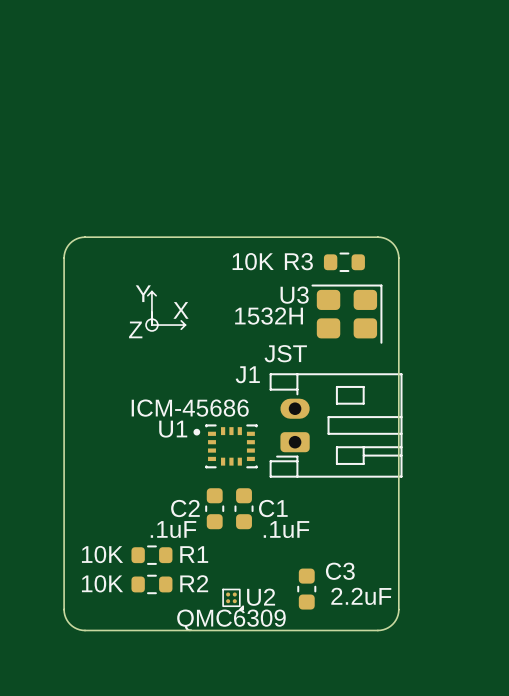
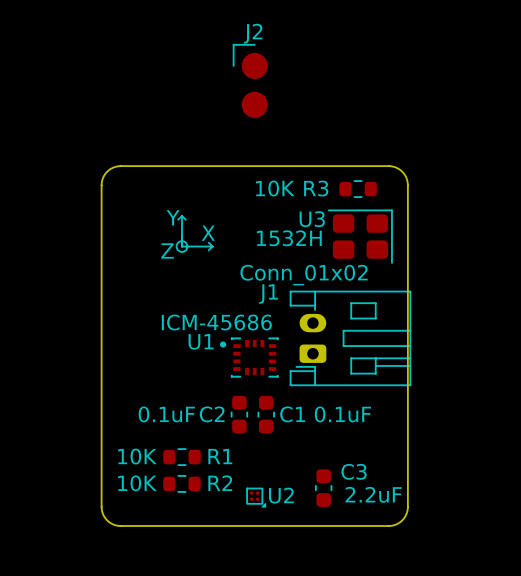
J2: none -> (250, 80)
J1 value: JST (285, 353) -> Conn_01x02 (304, 275)
C2 value: .1uF (173, 529) -> 0.1uF (166, 414)
C1 value: .1uF (286, 529) -> 0.1uF (342, 414)
U2 value: QMC6309 (231, 620) -> none

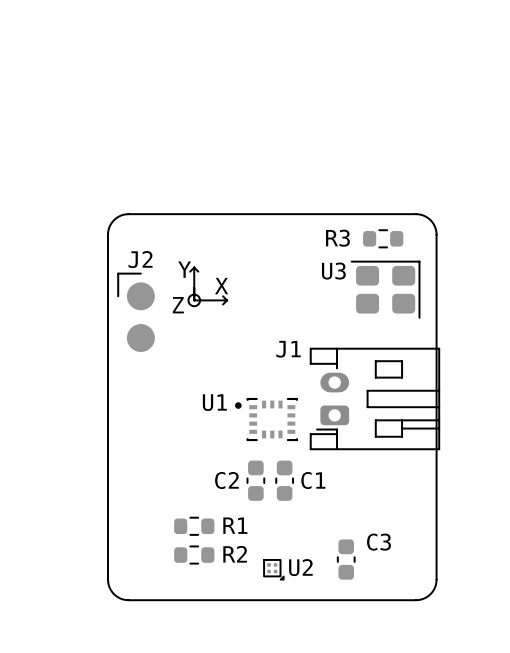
J2 position: (250, 80) -> (136, 312)
R3 value: 10K (275, 188) -> none
U3 value: 1532H (289, 238) -> none
J1 value: Conn_01x02 (304, 275) -> none
U1 value: ICM-45686 (216, 322) -> none
C2 value: 0.1uF (166, 414) -> none
C1 value: 0.1uF (342, 414) -> none
R1 value: 10K (137, 456) -> none
R2 value: 10K (137, 483) -> none
C3 value: 2.2uF (373, 494) -> none

